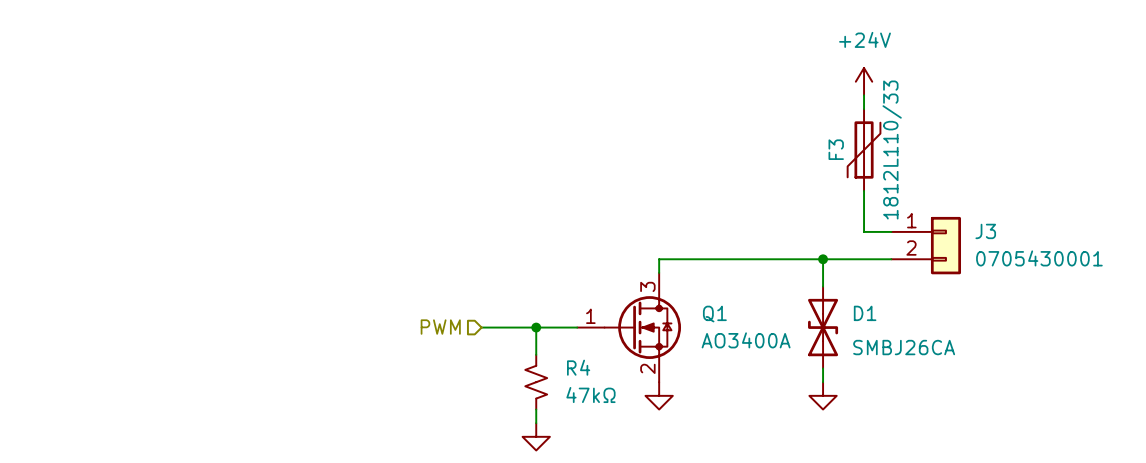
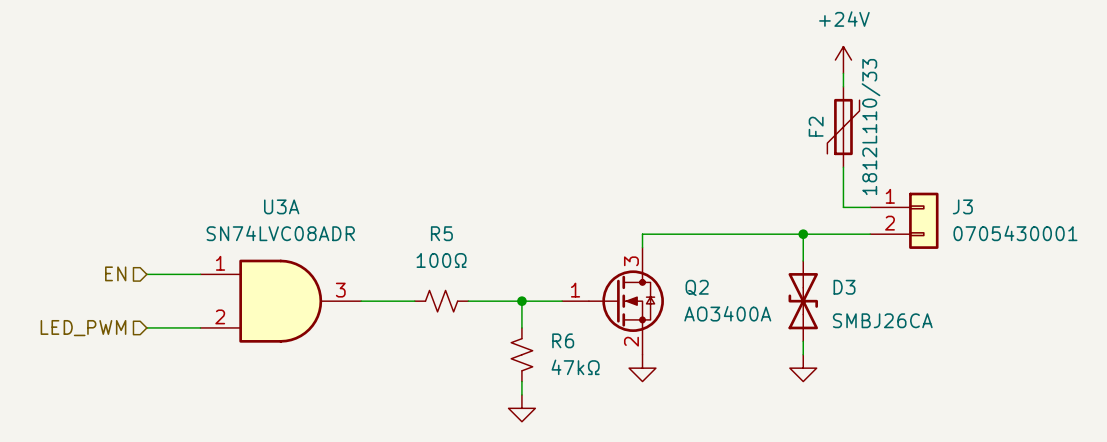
F3 name: F3 (836, 149) -> F2 (816, 126)
hierarchical label: none -> EN (115, 273)
wire: none -> (146, 274) (200, 274)
D1 name: D1 (865, 313) -> D3 (844, 287)
Q1 name: Q1 (714, 314) -> Q2 (697, 287)
U3A: none -> SN74LVC08ADR (280, 301)
wire: none -> (361, 301) (414, 301)
hierarchical label: PWM (440, 327) -> none
R5: none -> 100Ω (441, 301)
wire: none -> (146, 327) (200, 327)
hierarchical label: none -> LED_PWM (83, 328)
R4 name: R4 (578, 367) -> R6 (563, 340)

